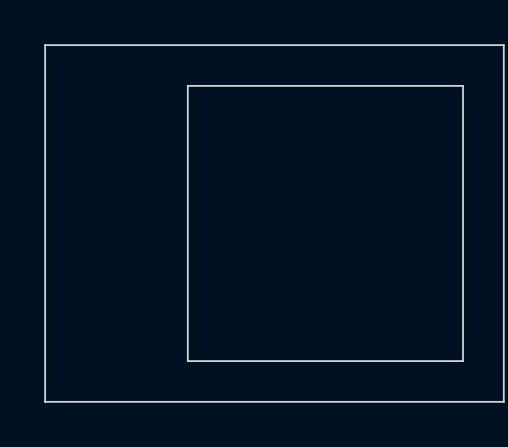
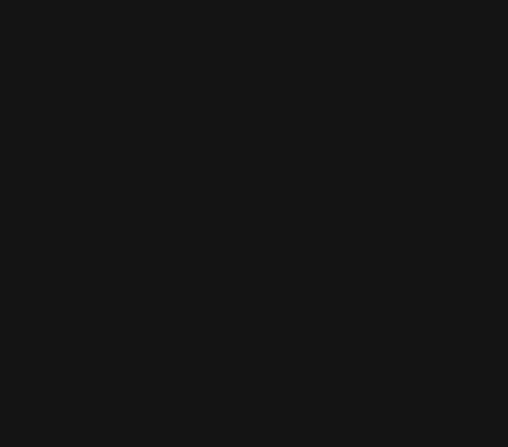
board edge: (45, 45) (45, 401) (503, 401) (503, 45) (45, 45) -> none
board edge: (187, 85) (463, 85) (463, 361) (187, 361) (187, 85) -> none

